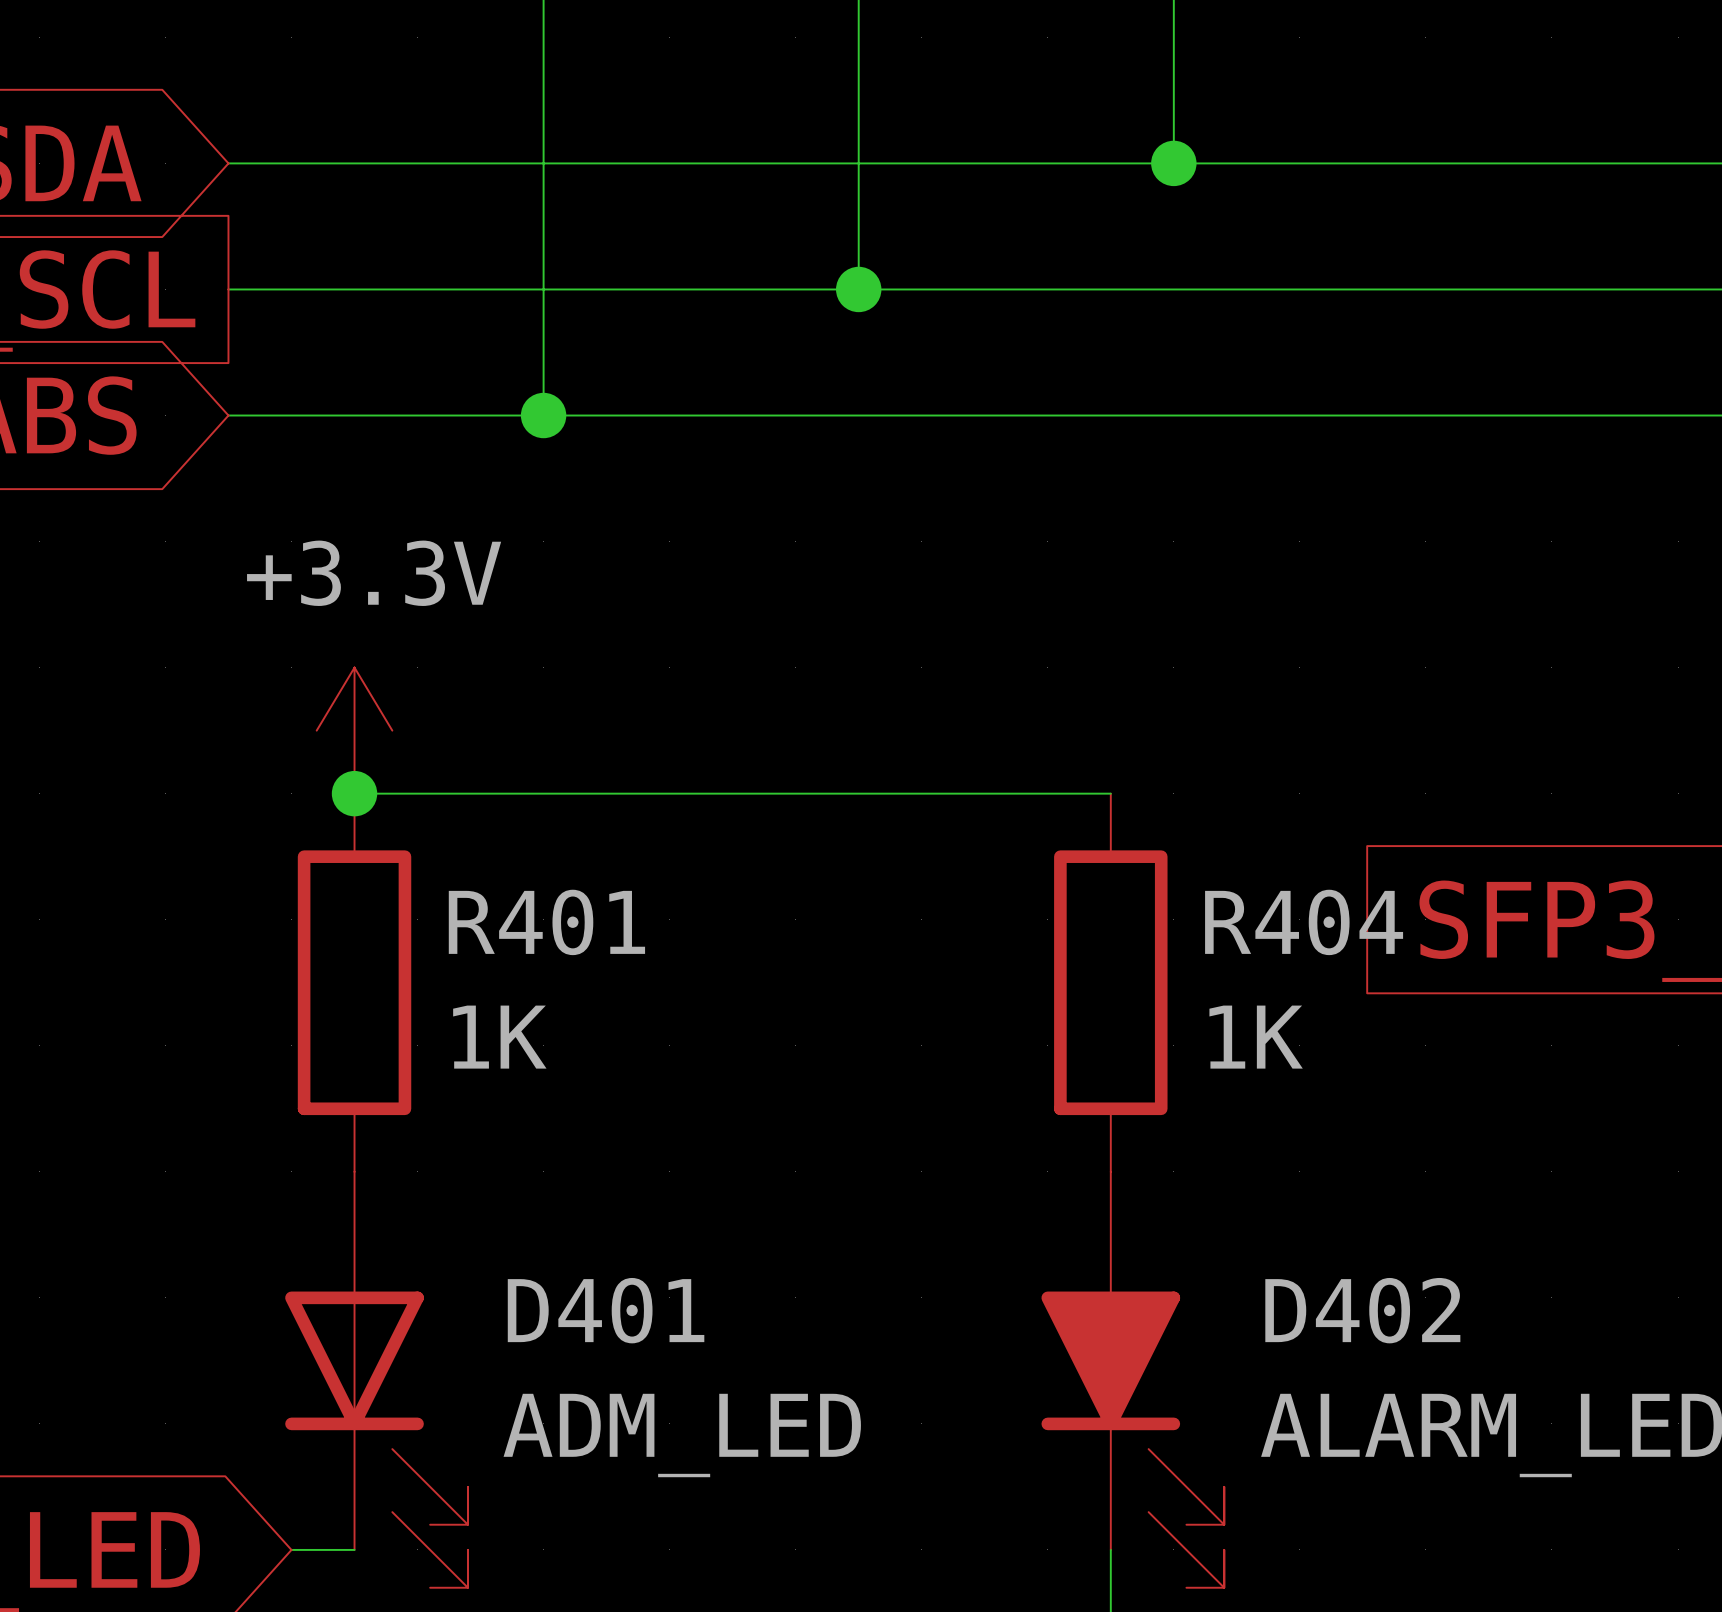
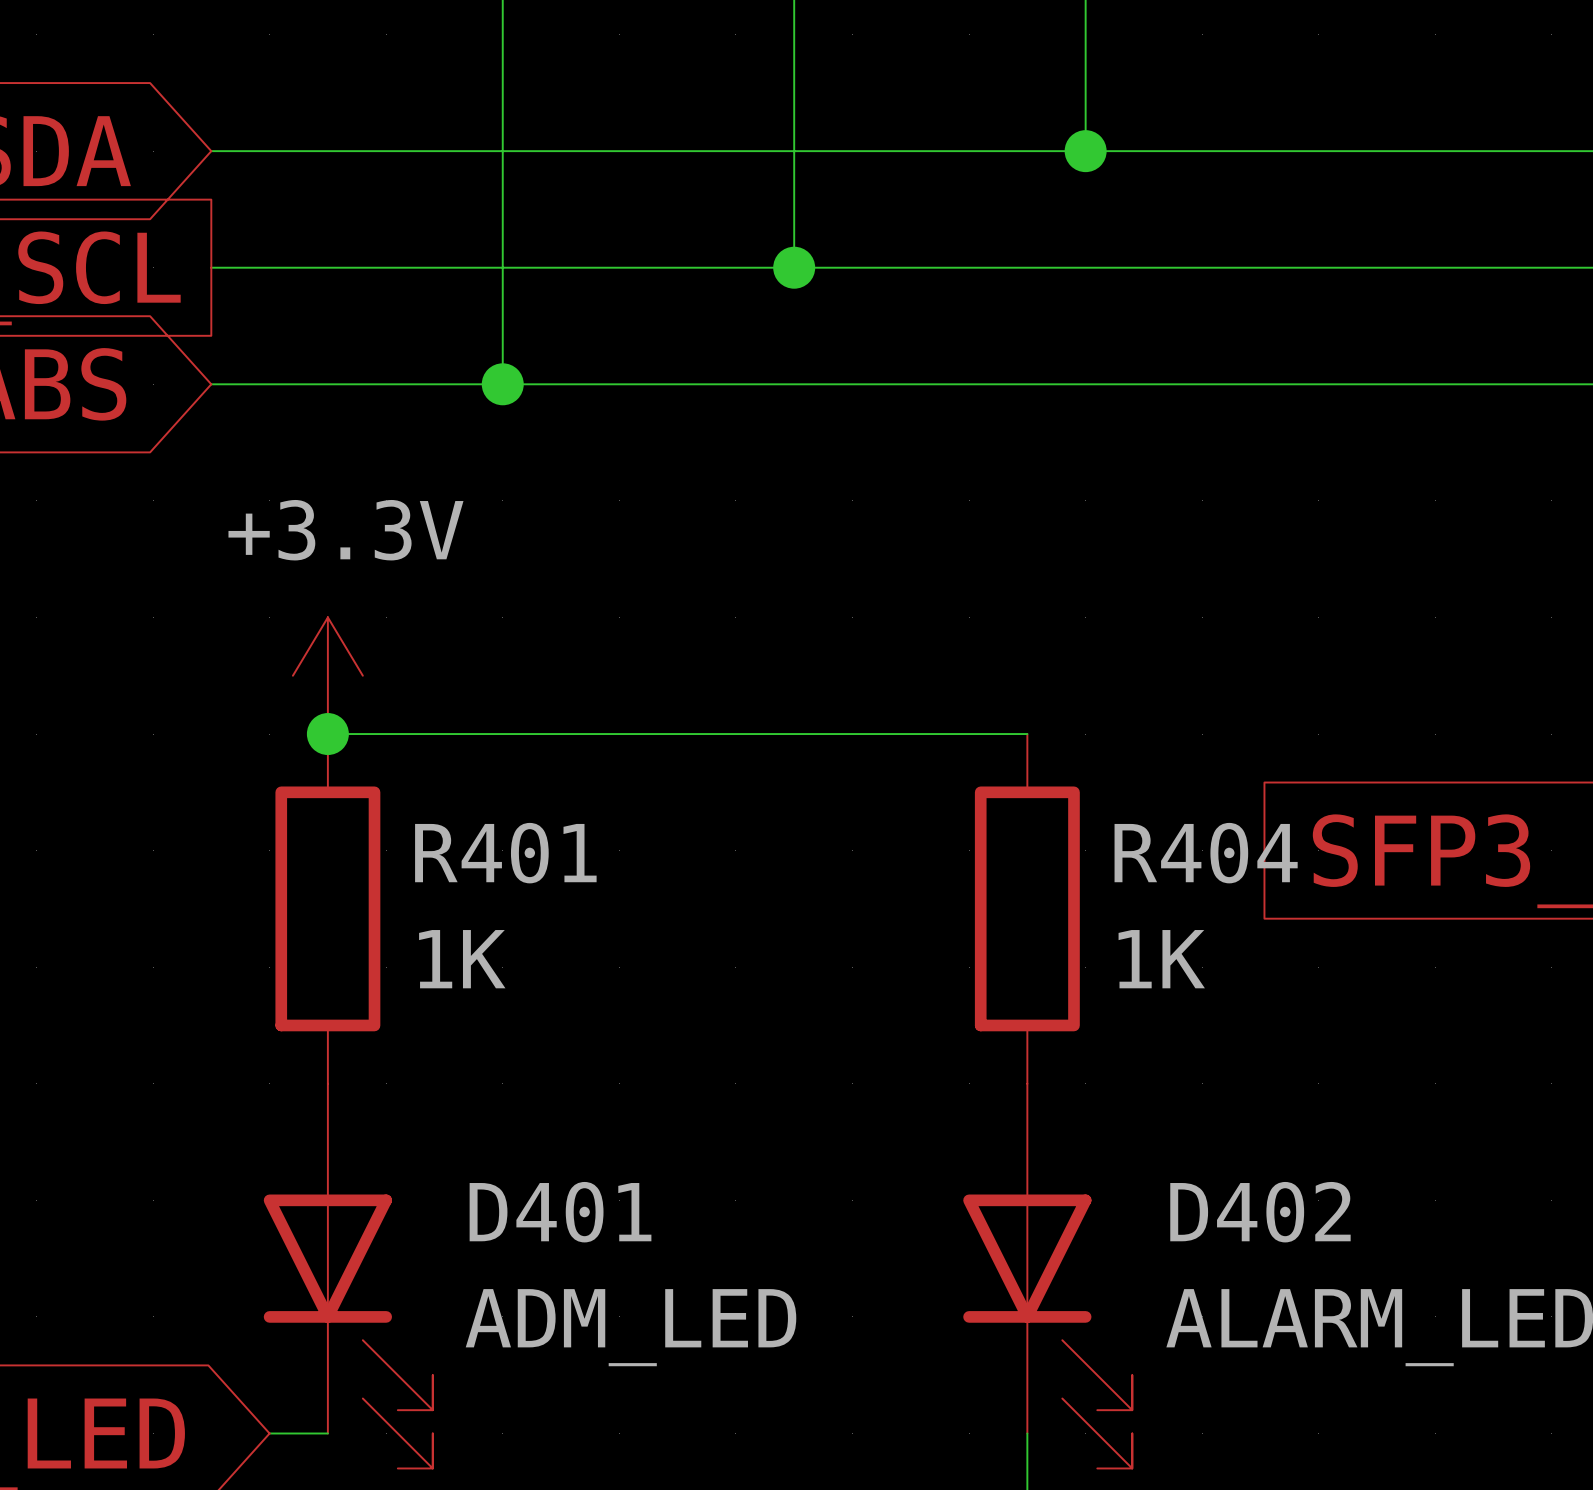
D402 symbol: [1041, 1171, 1225, 1588] -> [963, 1083, 1133, 1469]

